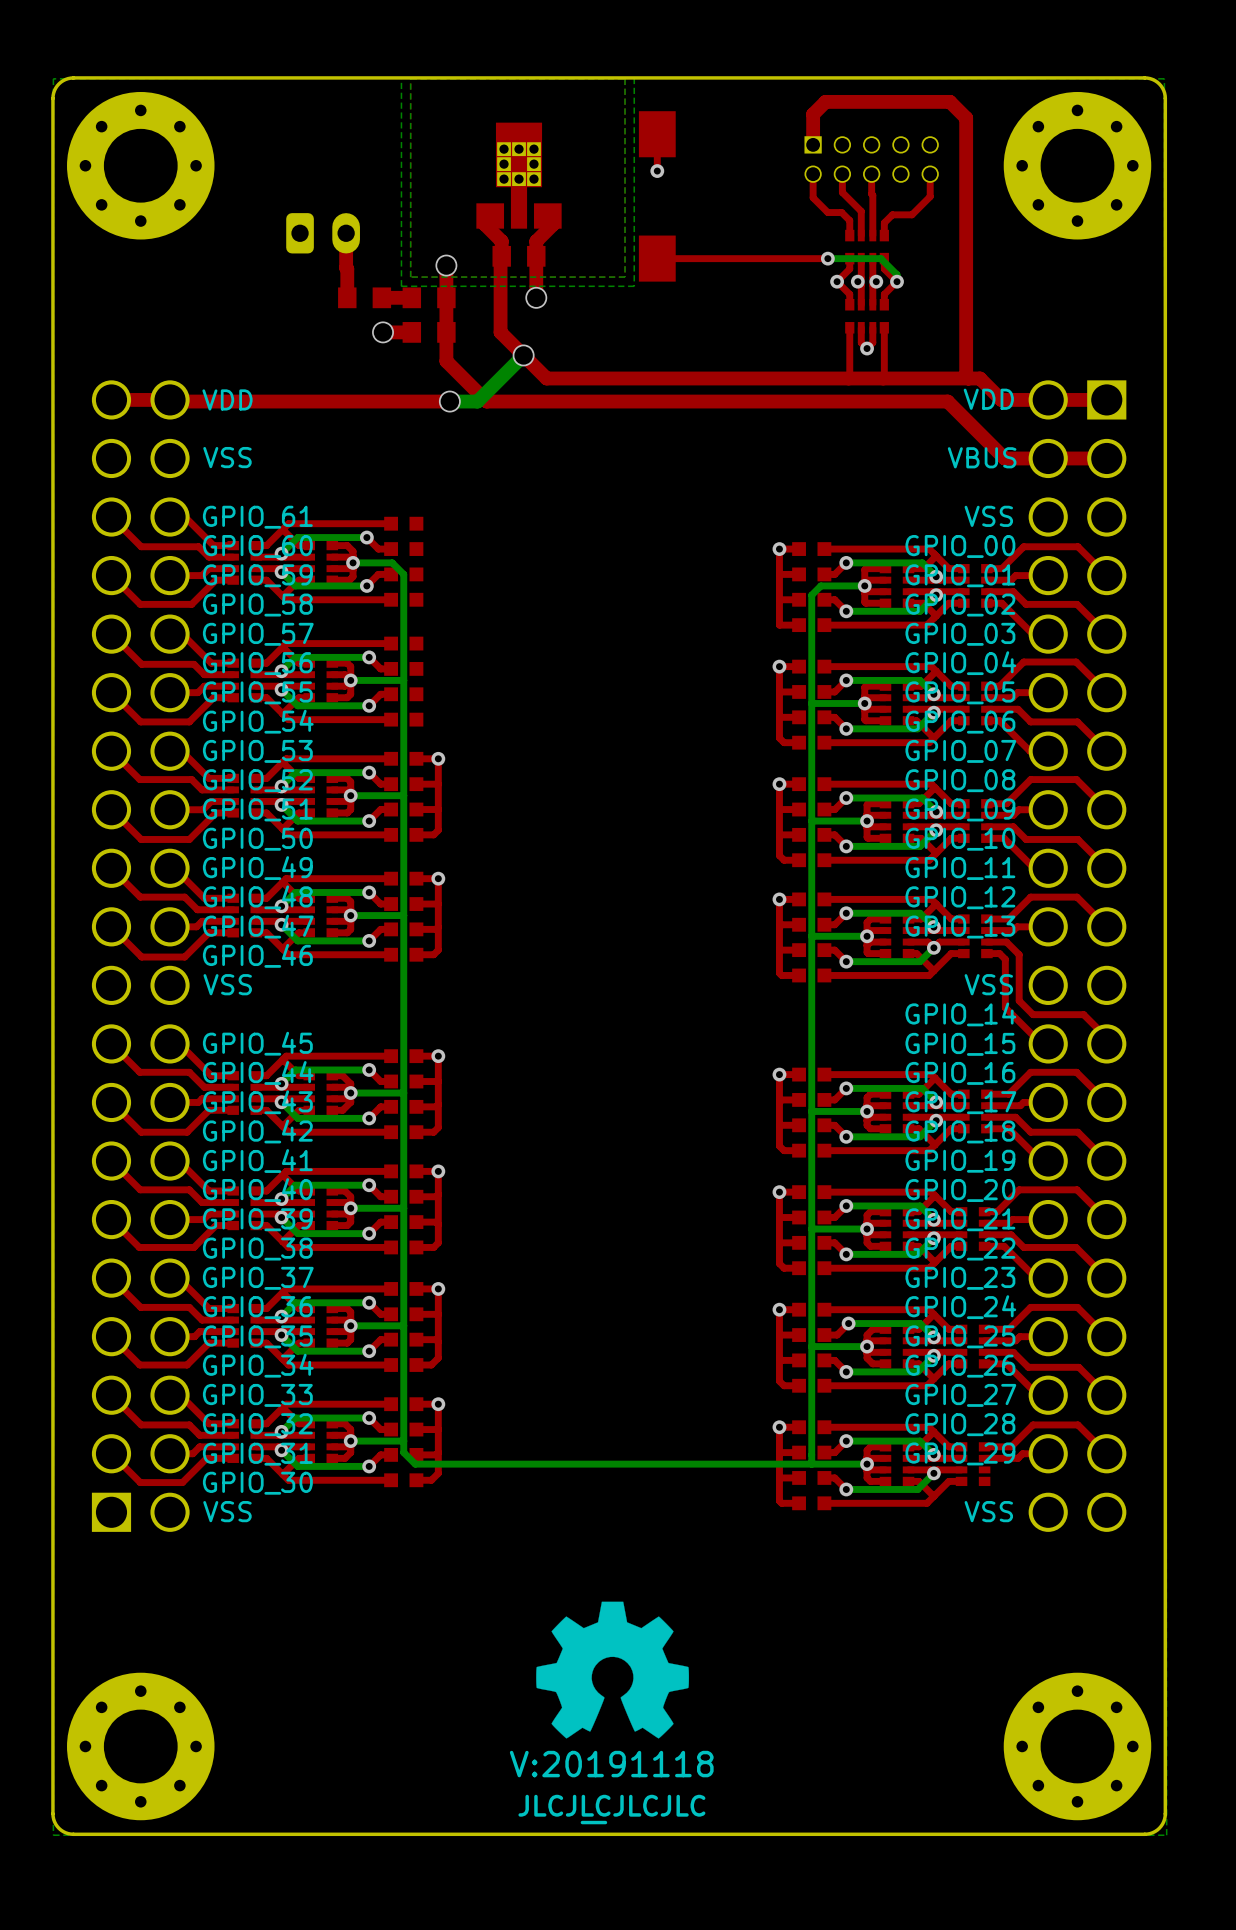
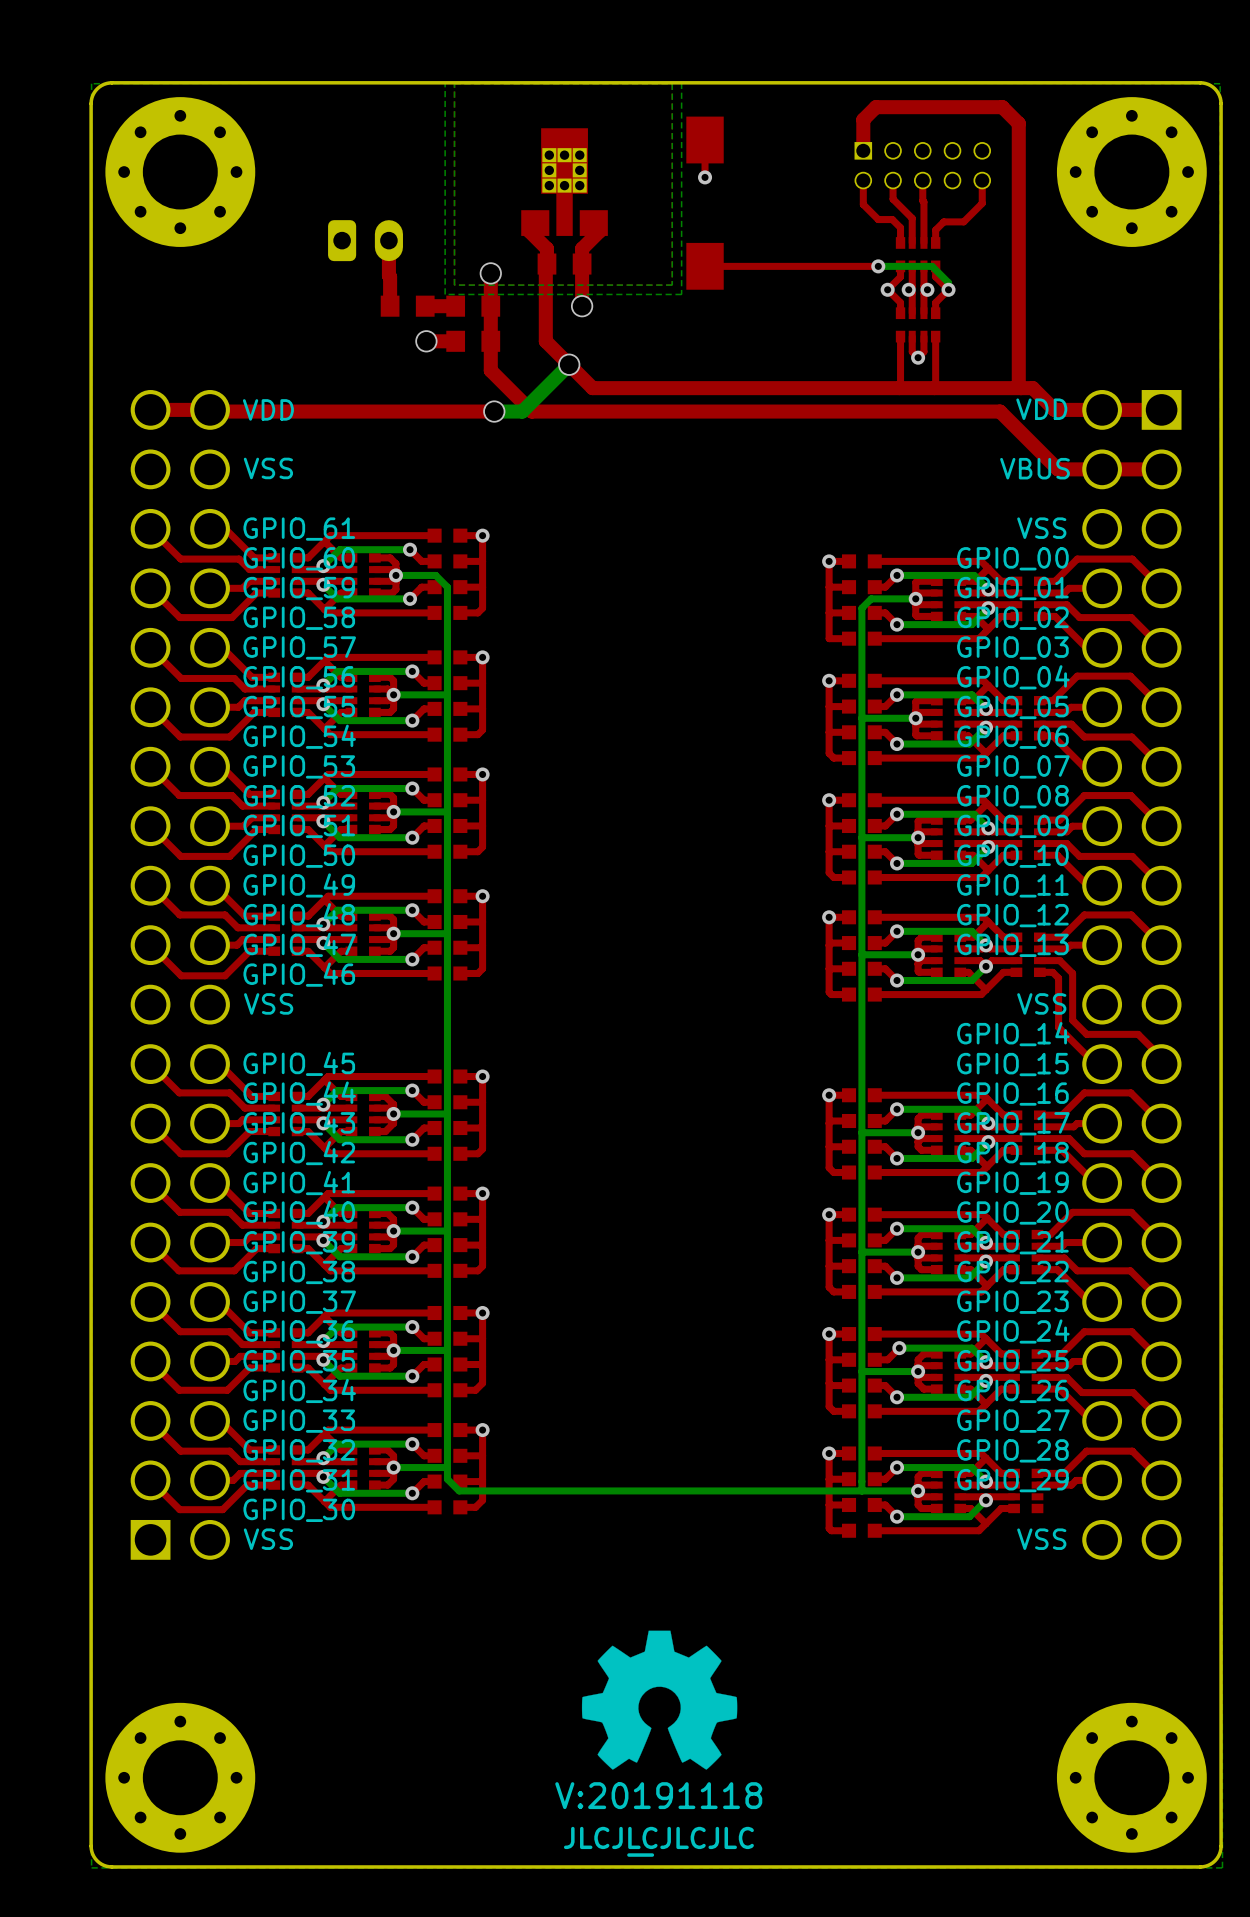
top track: none -> (460, 535) (482, 535) (482, 608) (477, 612) (460, 612)
via: none -> (482, 535)
top track: none -> (482, 561) (460, 561)
top track: none -> (482, 587) (460, 587)
top track: none -> (460, 657) (482, 657) (482, 729) (477, 734) (460, 734)
via: none -> (482, 657)
top track: none -> (482, 683) (460, 683)
top track: none -> (482, 708) (460, 708)

